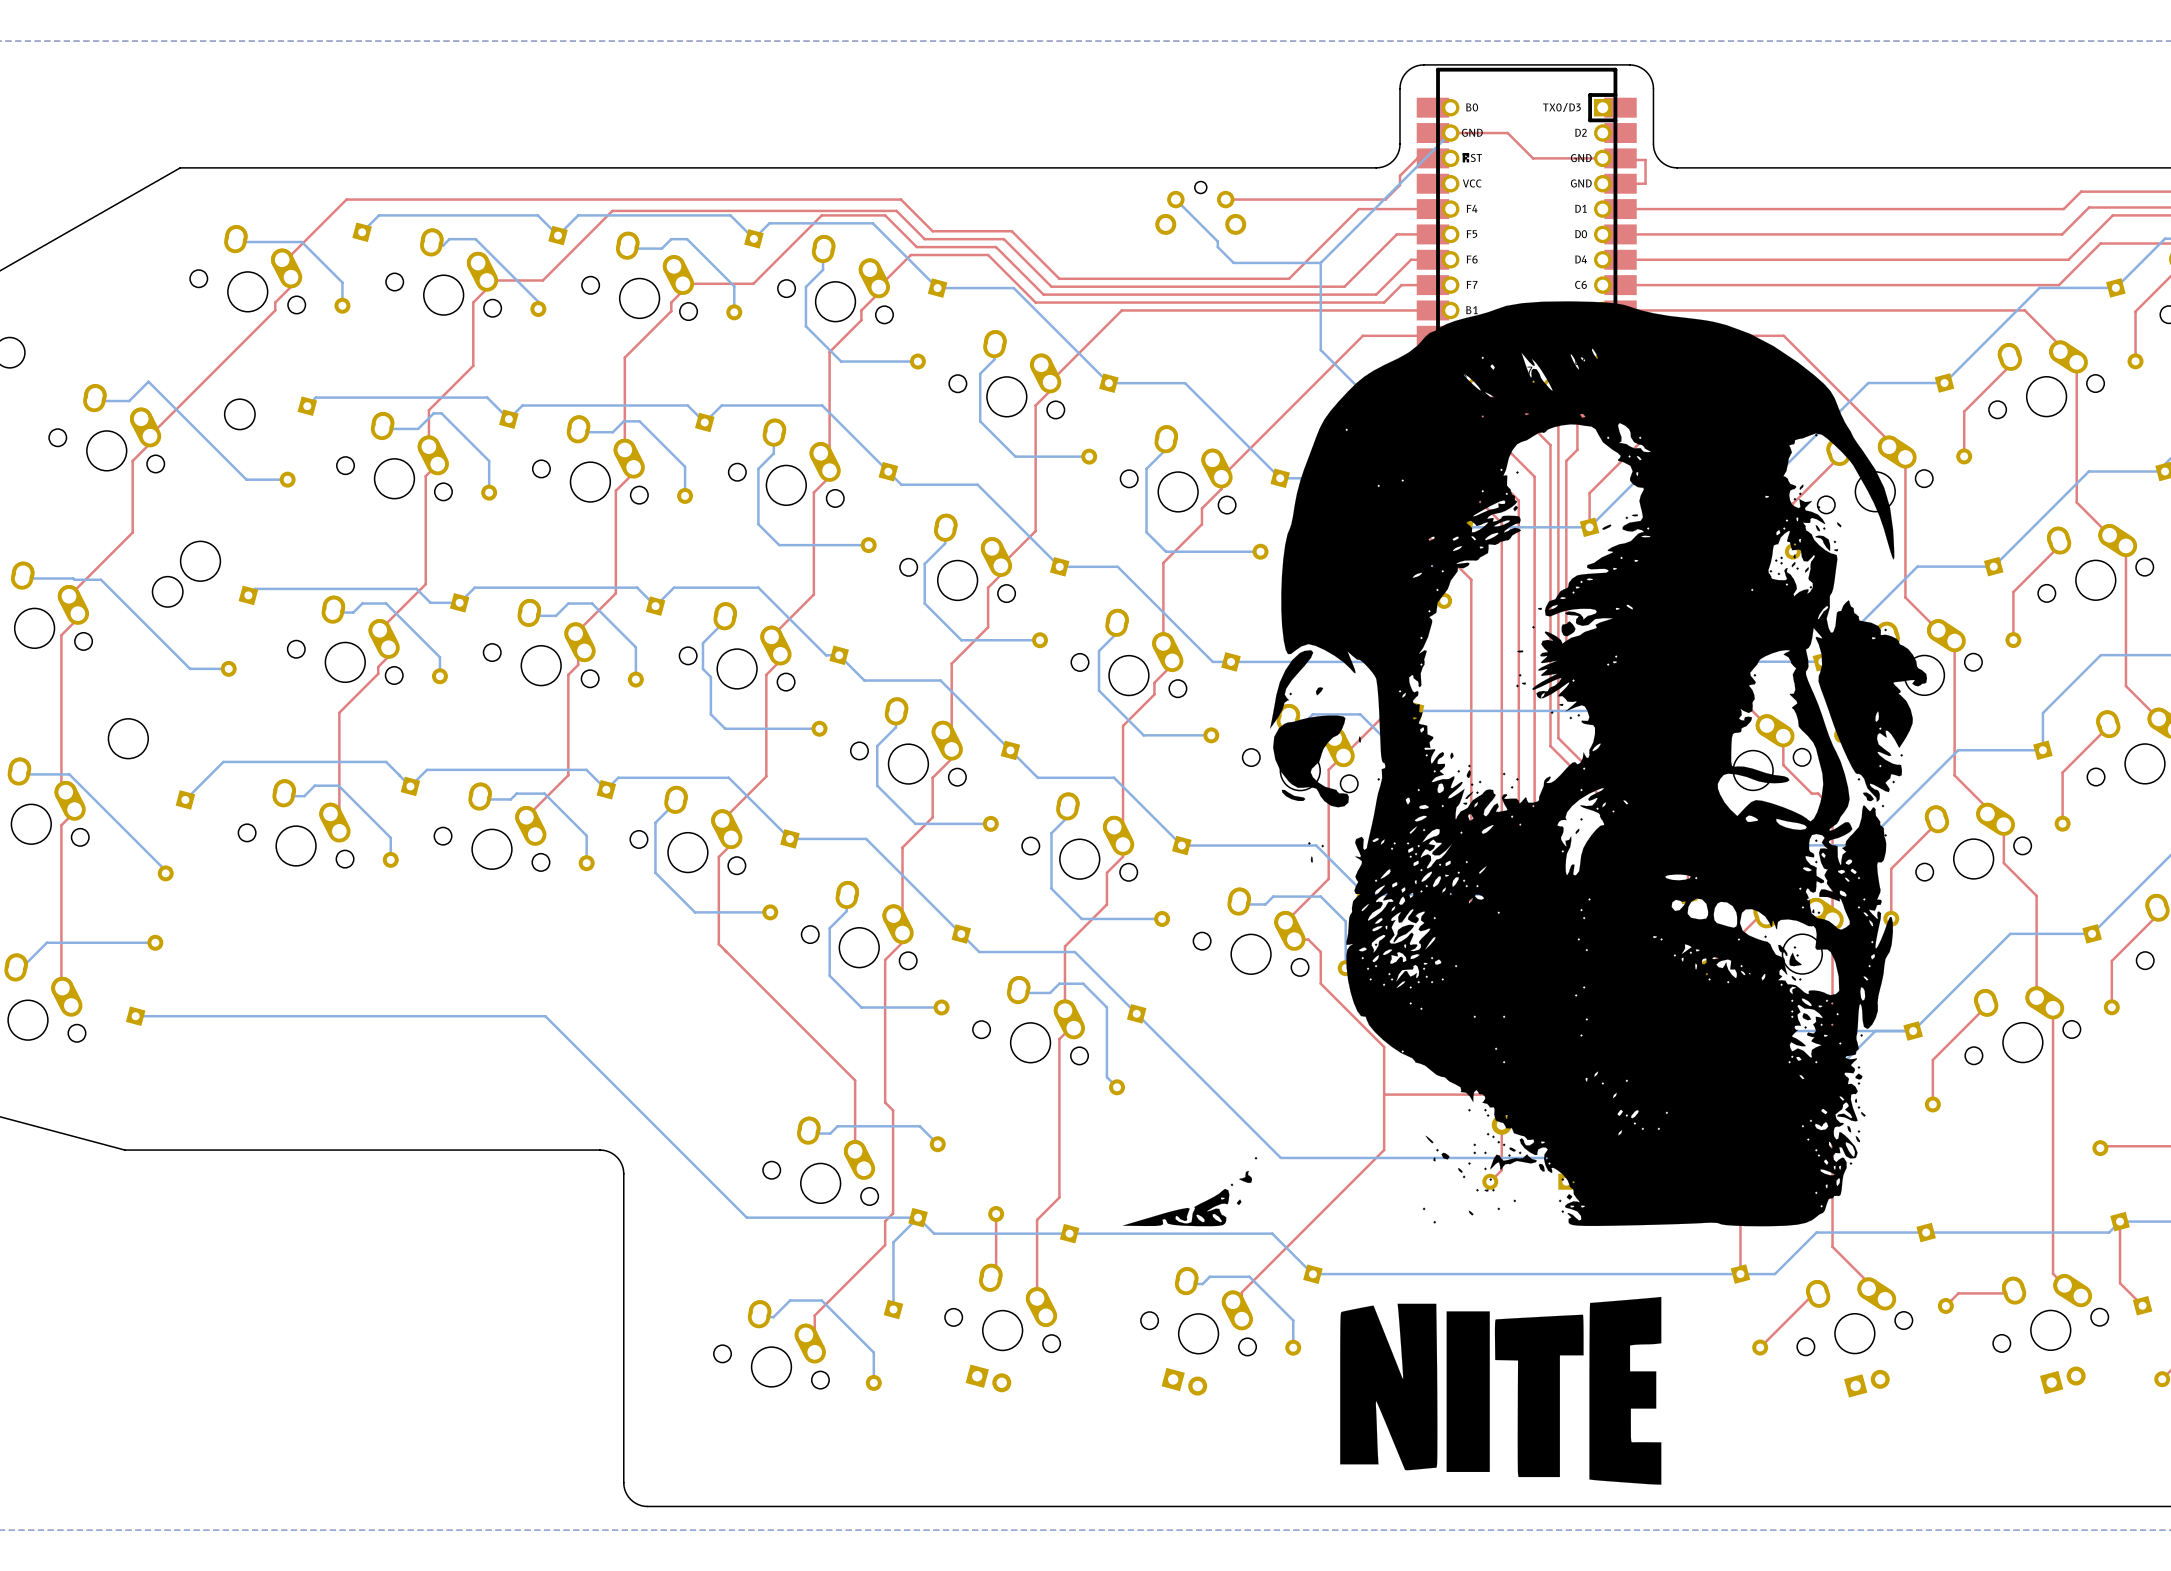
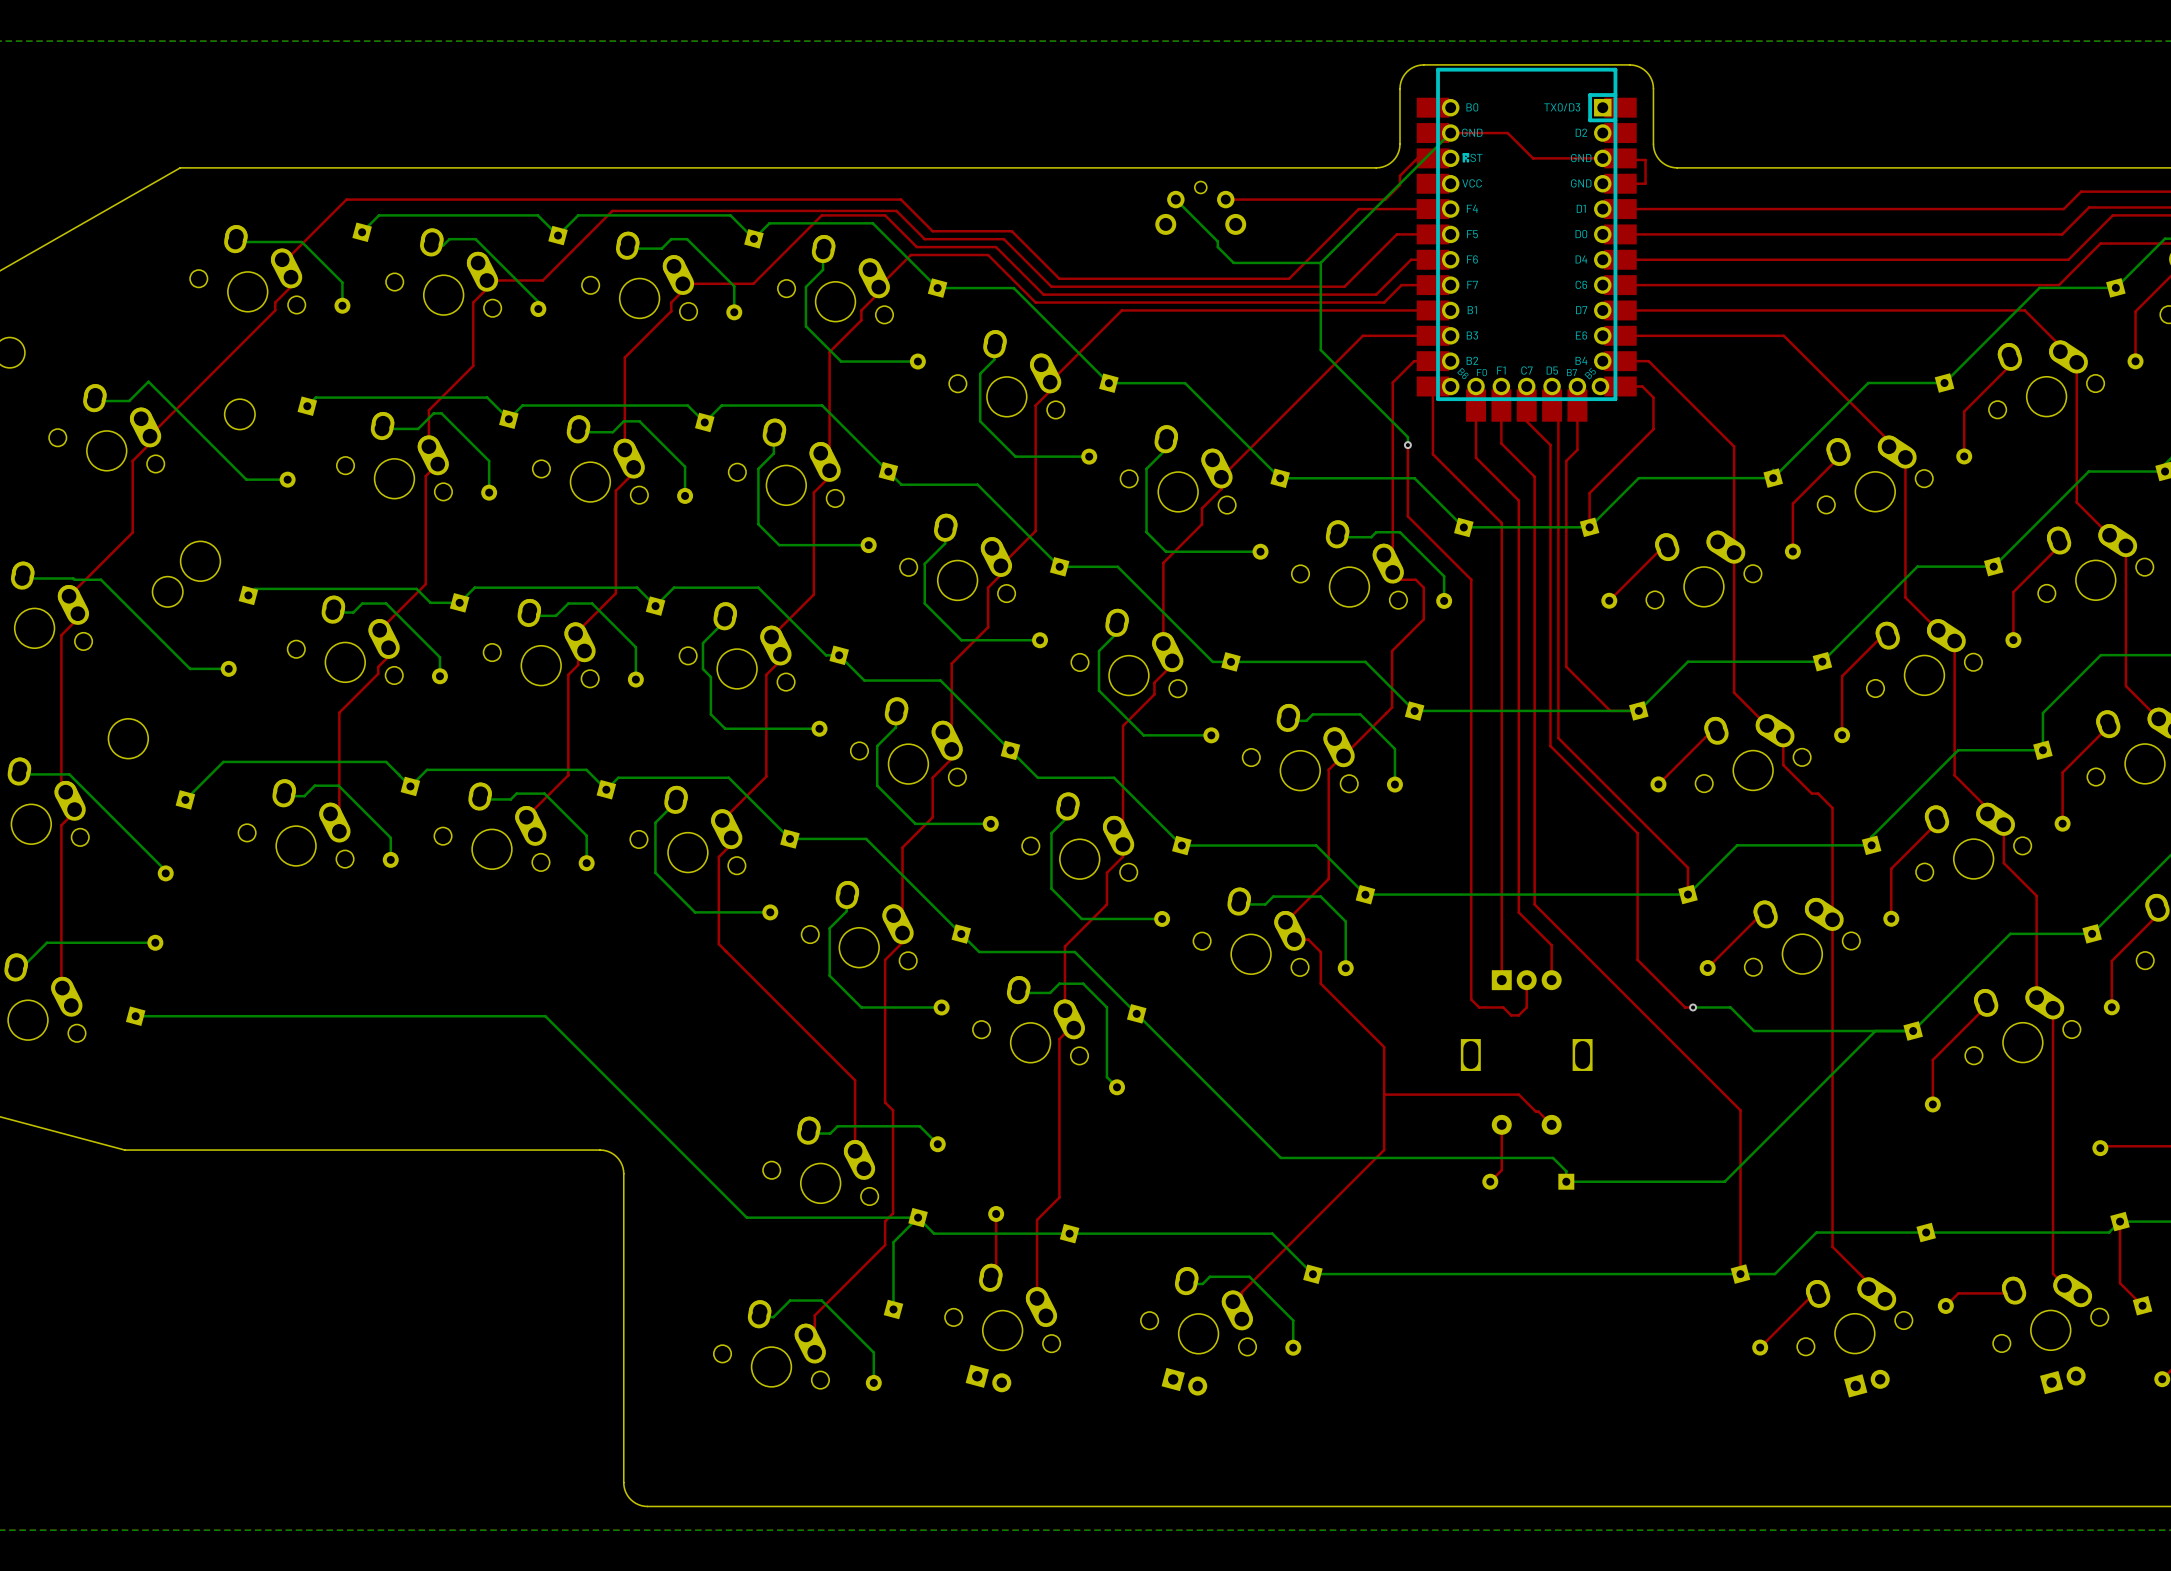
drawing: [1122, 301, 1928, 1227] -> none
drawing: [1340, 1296, 1662, 1485] -> none

